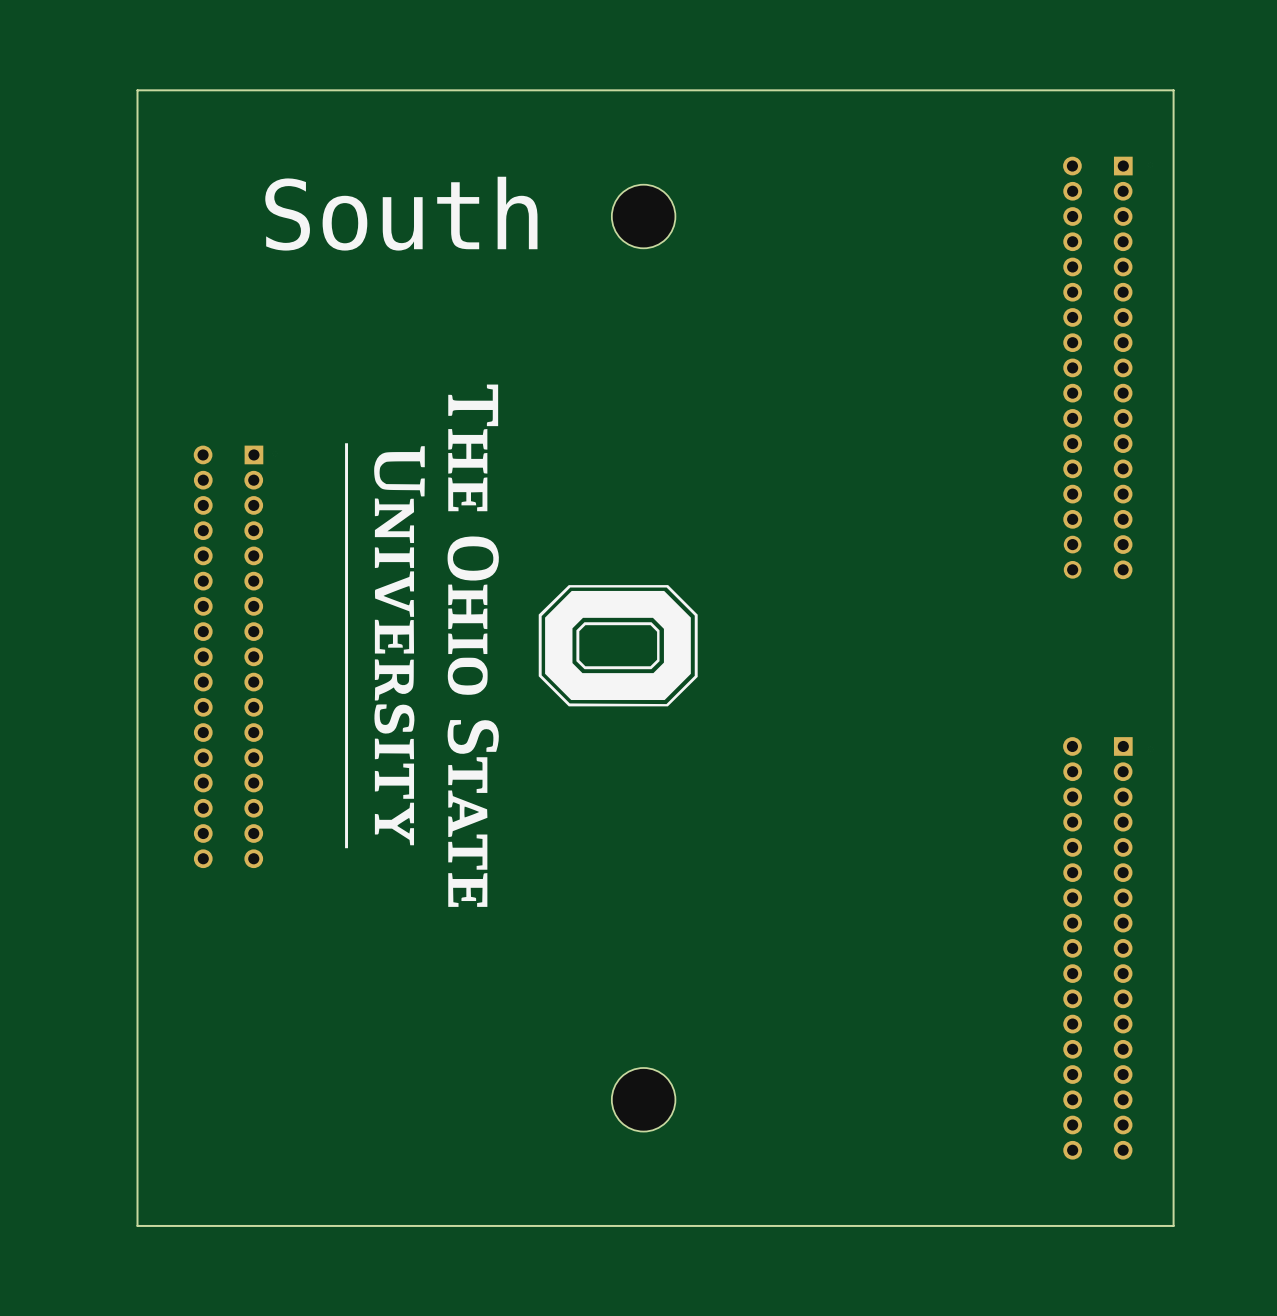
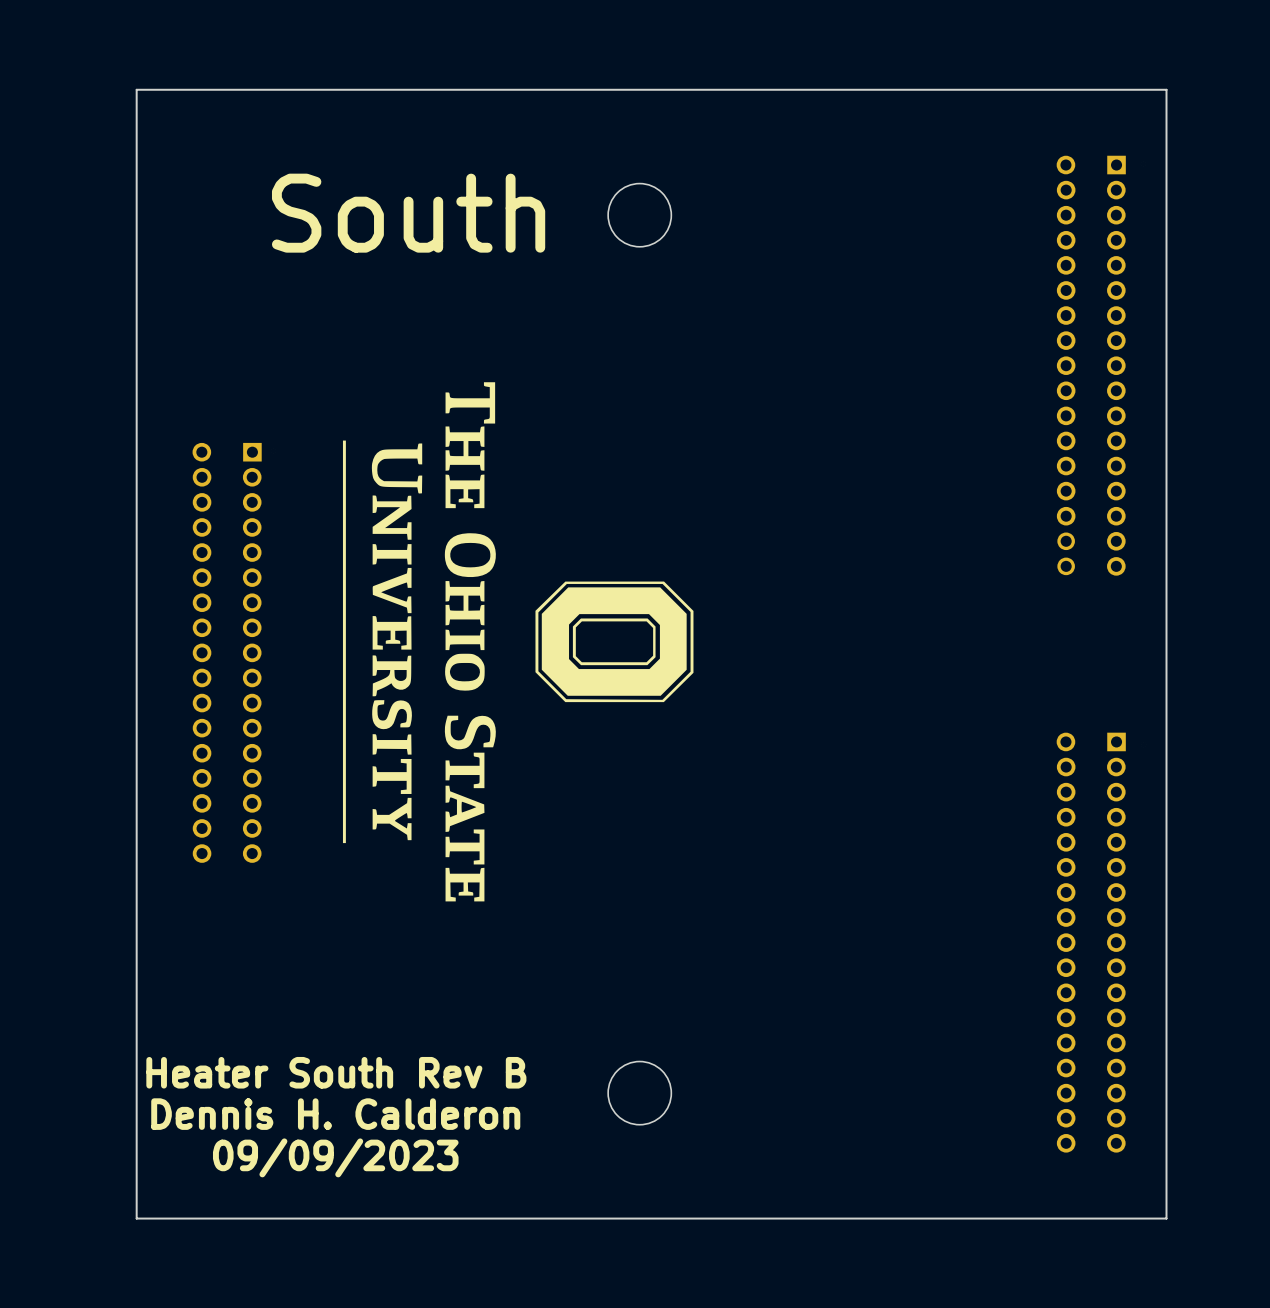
text: none -> Heater South Rev B (336, 1072)
text: none -> Dennis H. Calderon (335, 1114)
text: none -> 09/09/2023 (335, 1157)

